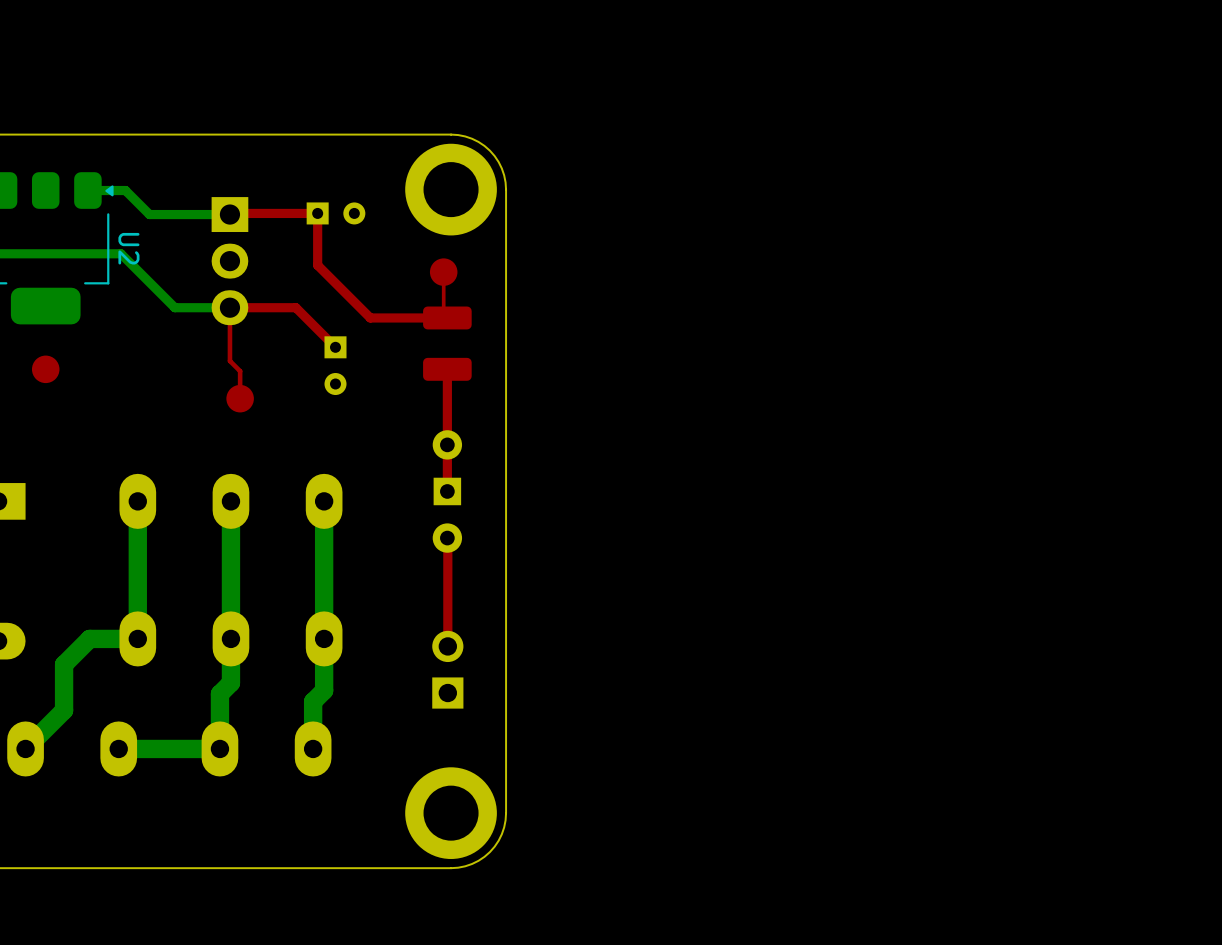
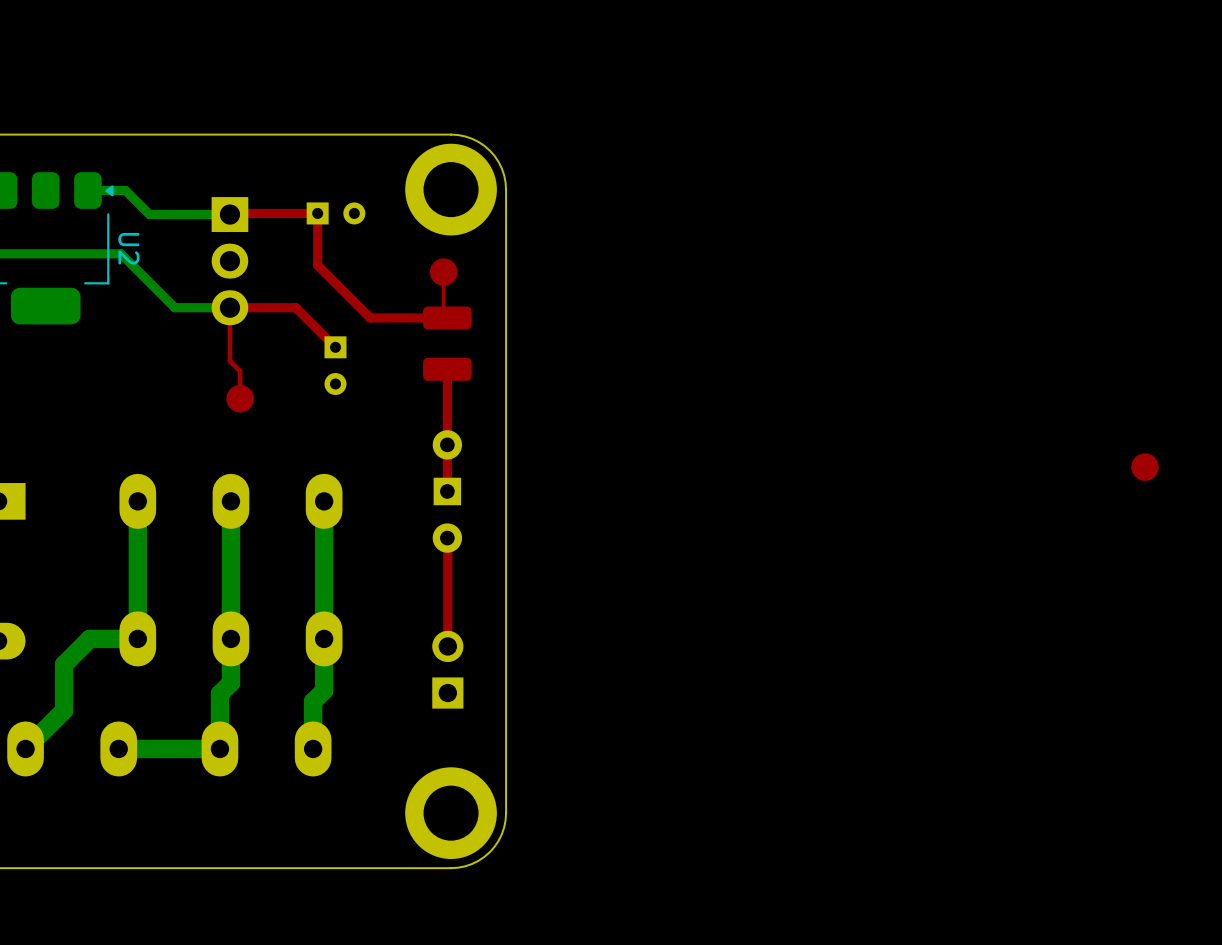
part: (45, 369) -> none
part: none -> (1145, 467)

